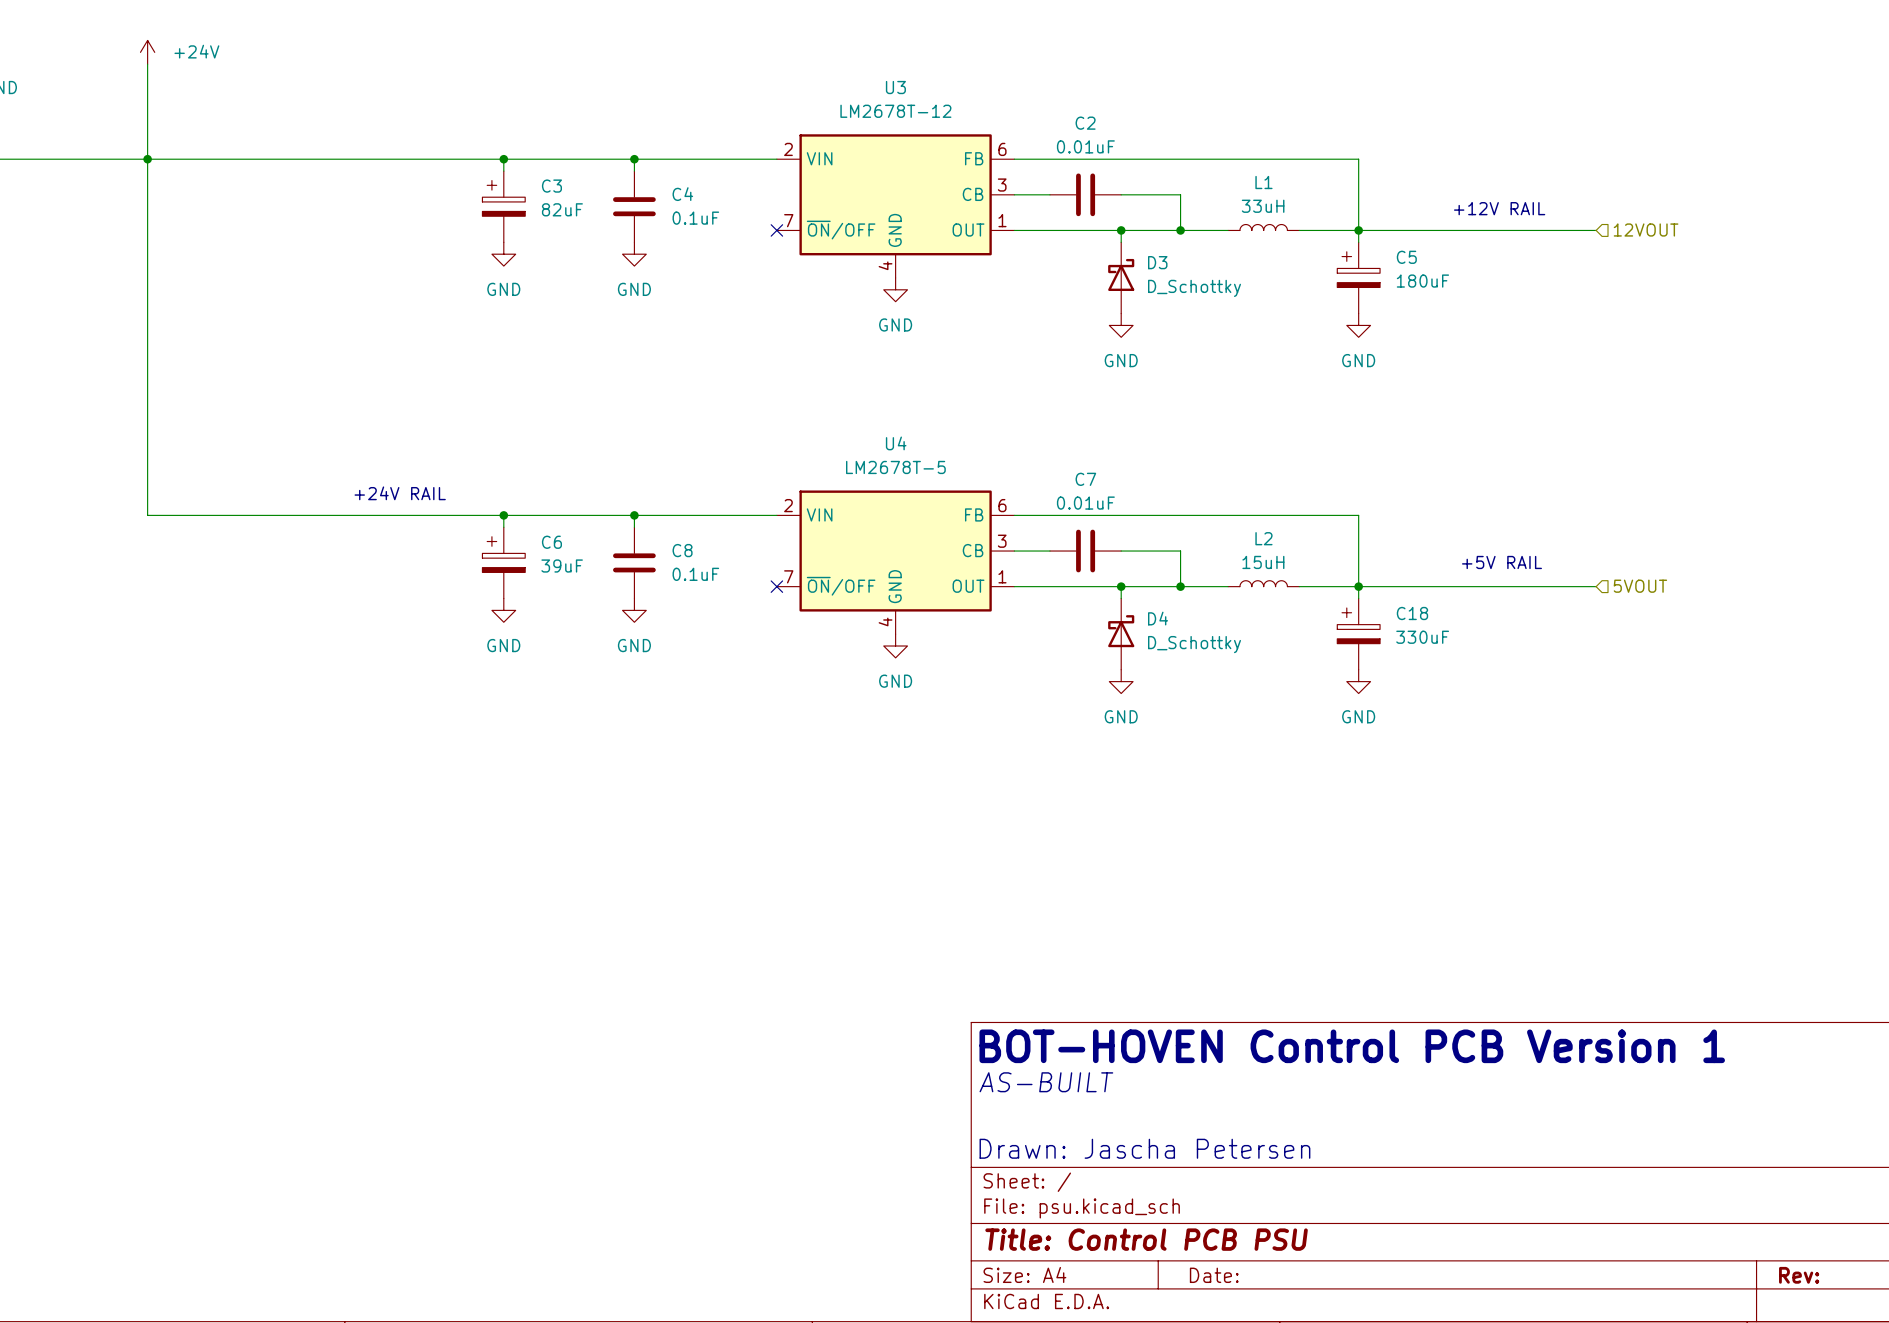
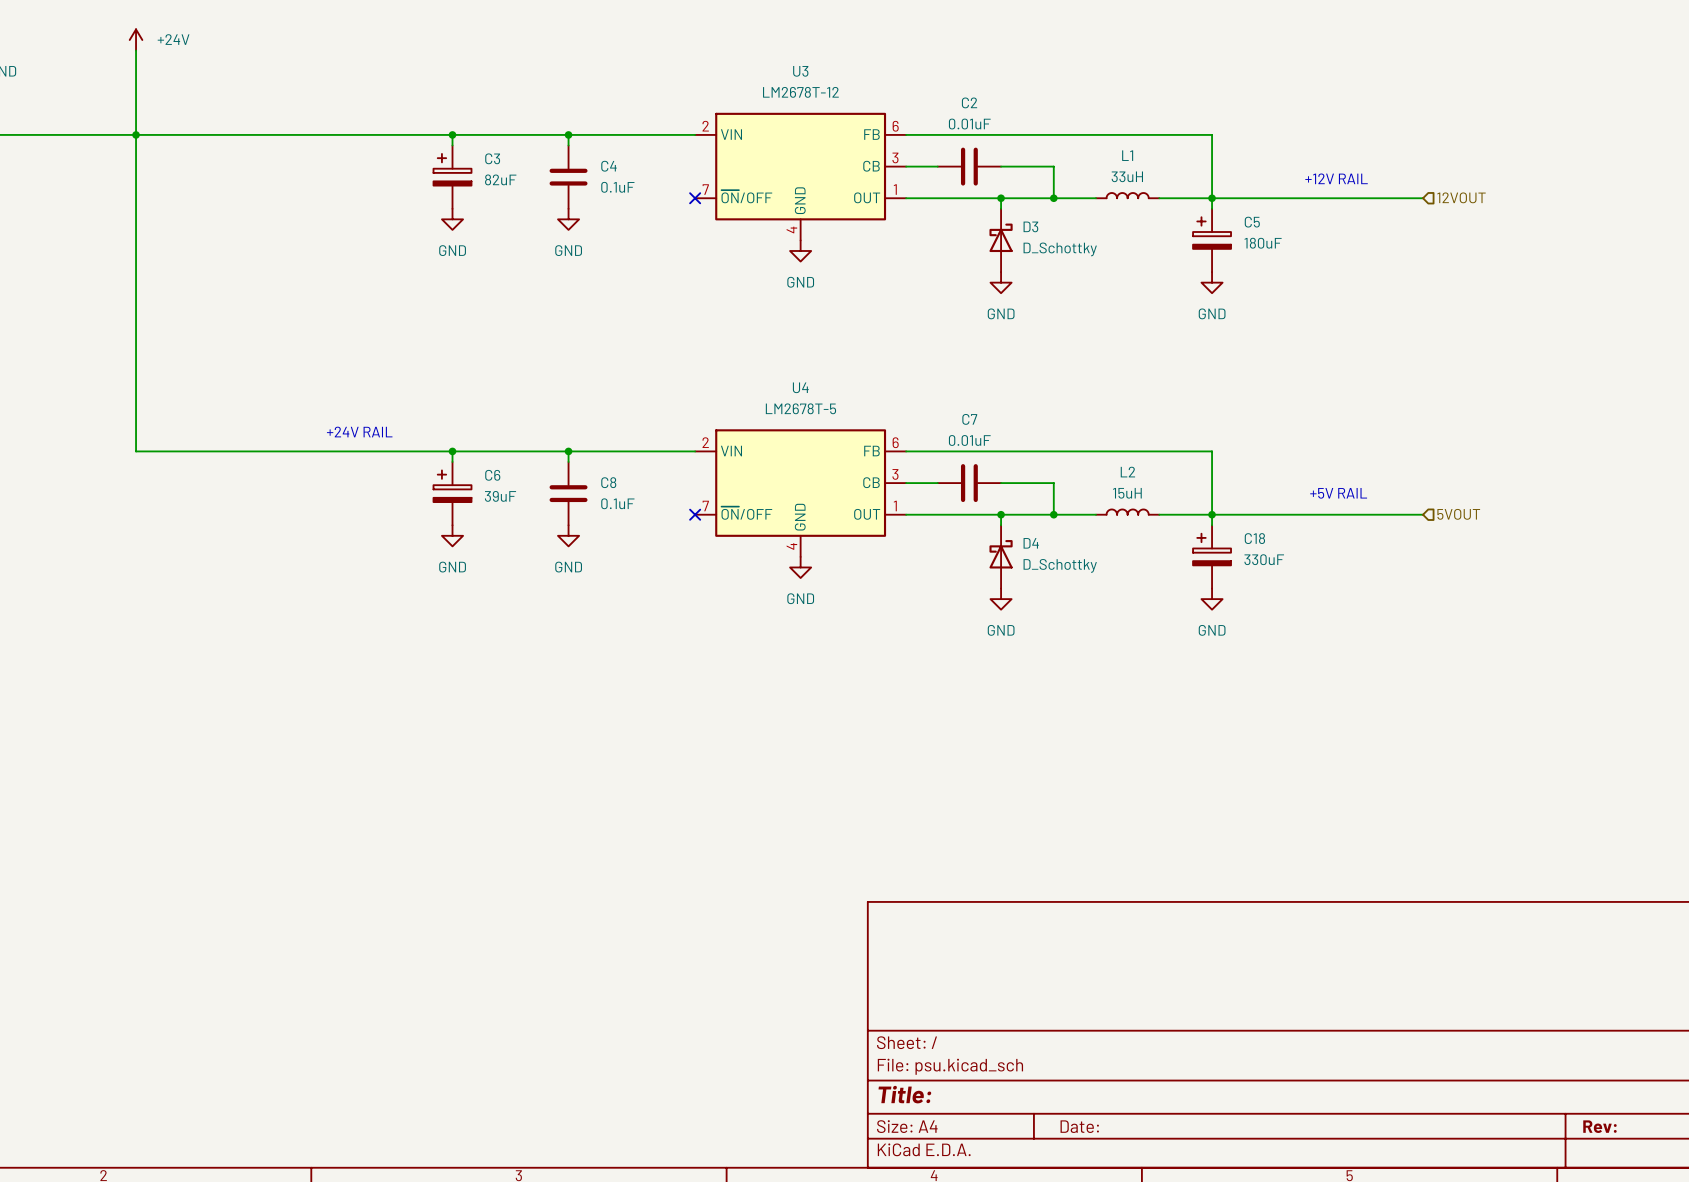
text: BOT-HOVEN Control PCB Version 1 (1352, 1046) -> none
text: AS-BUILT (1046, 1082) -> none
text: Drawn: Jascha Petersen (1144, 1148) -> none
title block: Title: Control PCB PSU (1146, 1239) -> Title: (904, 1094)

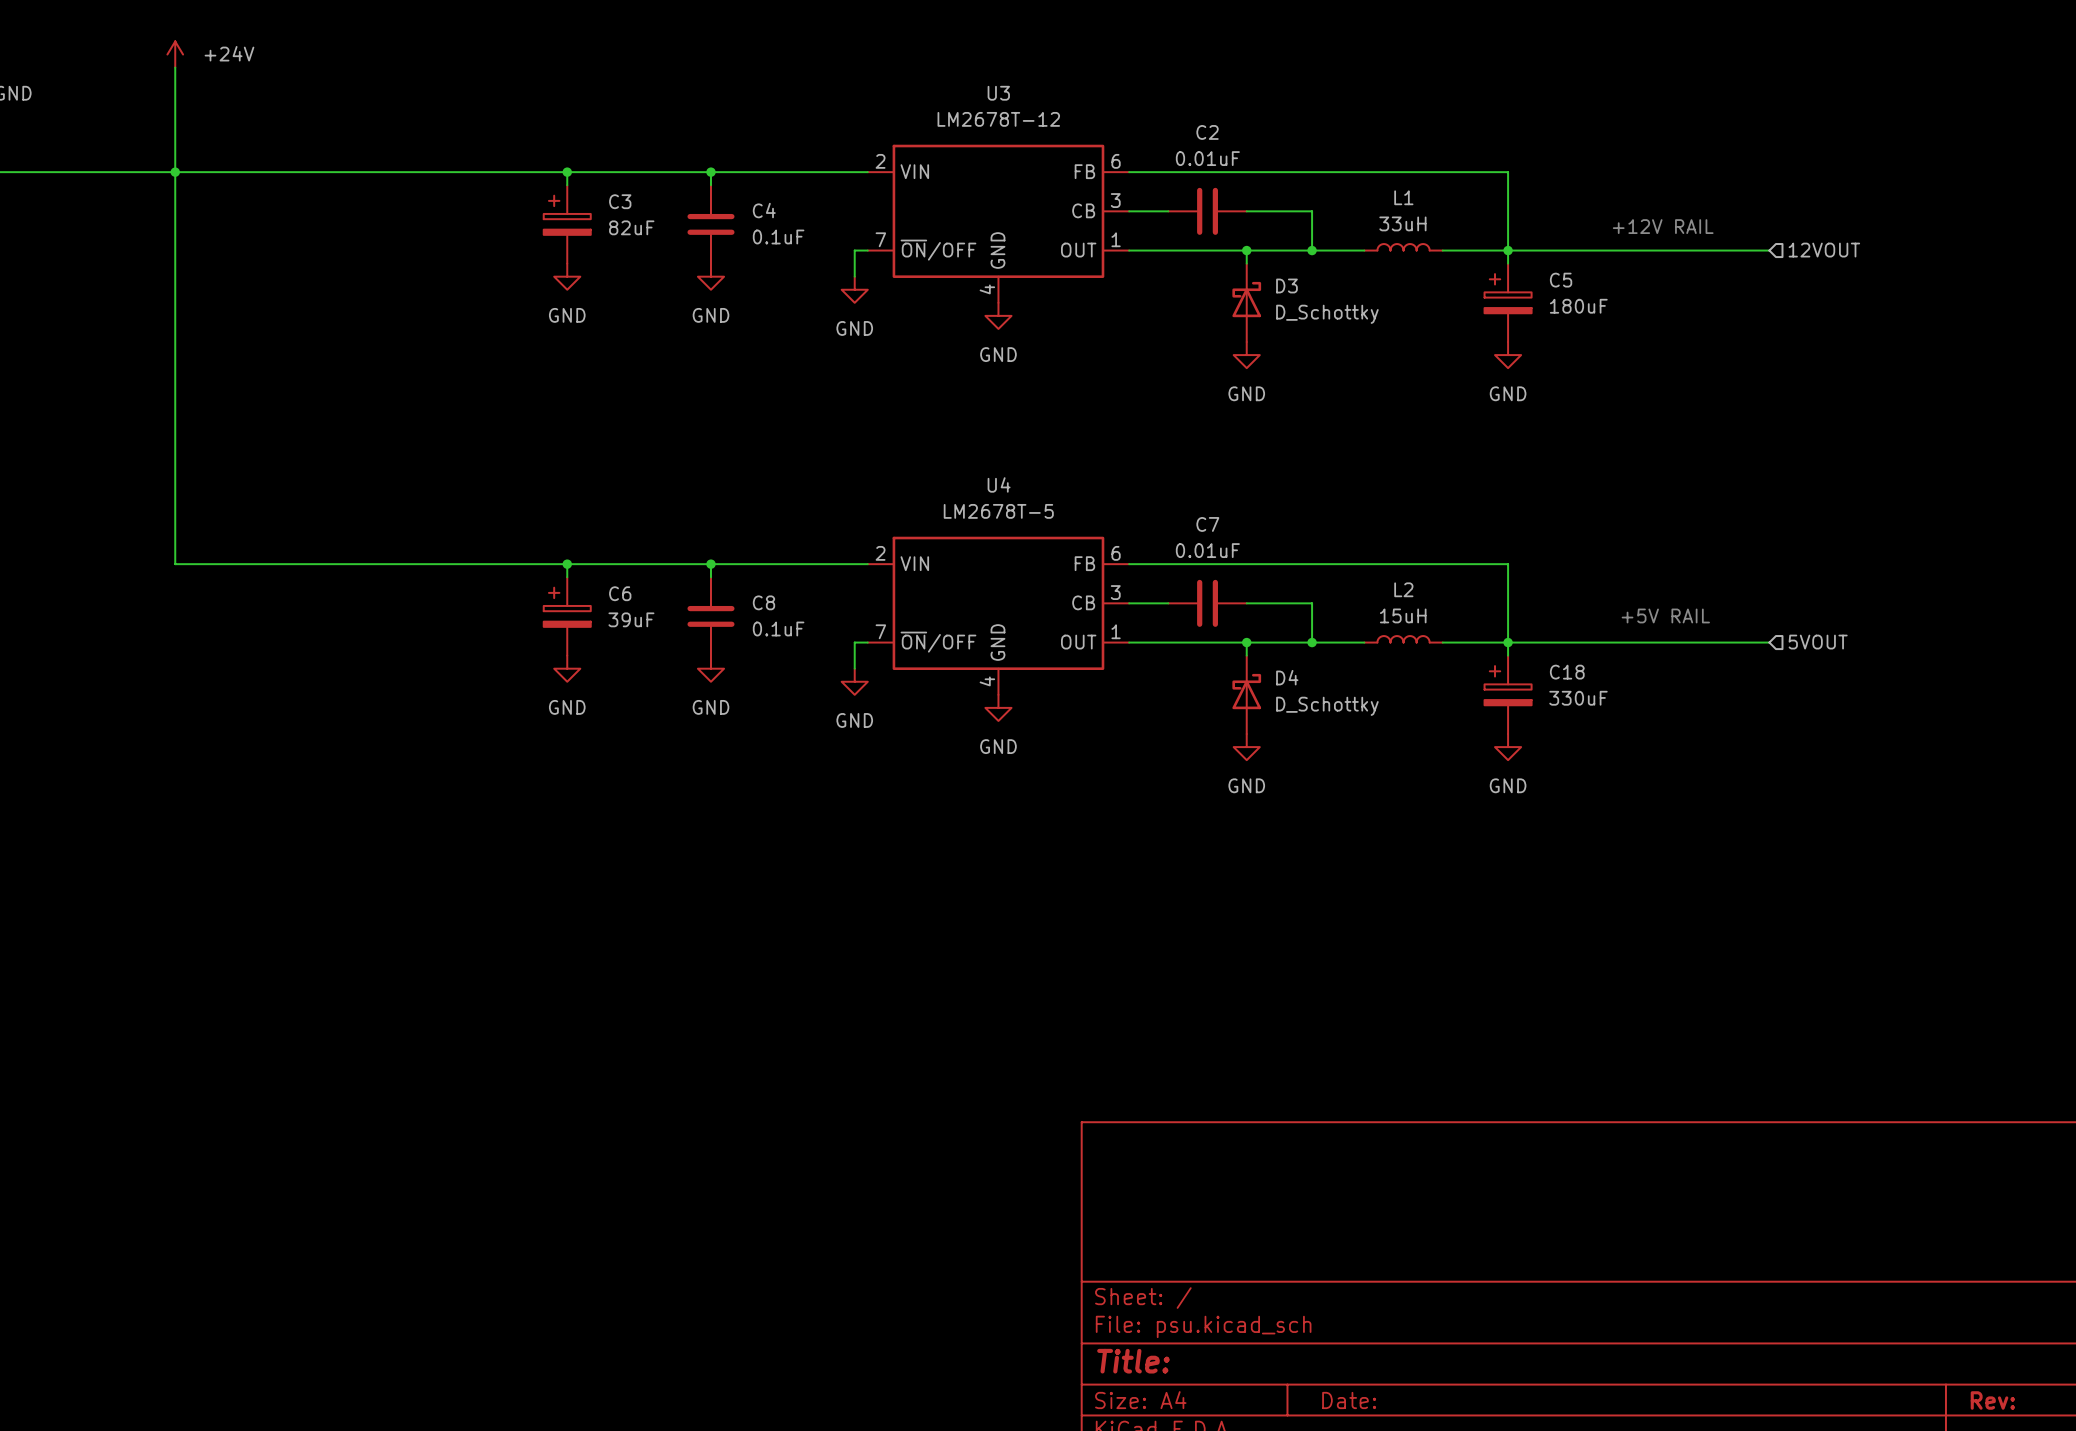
wire: none -> (867, 250) (854, 250) (854, 276)
no-connect mark: (695, 198) -> none
power symbol: none -> GND (854, 289)
text: +24V RAIL (359, 432) -> none
wire: none -> (867, 642) (854, 642) (854, 668)
no-connect mark: (695, 514) -> none
power symbol: none -> GND (854, 681)

